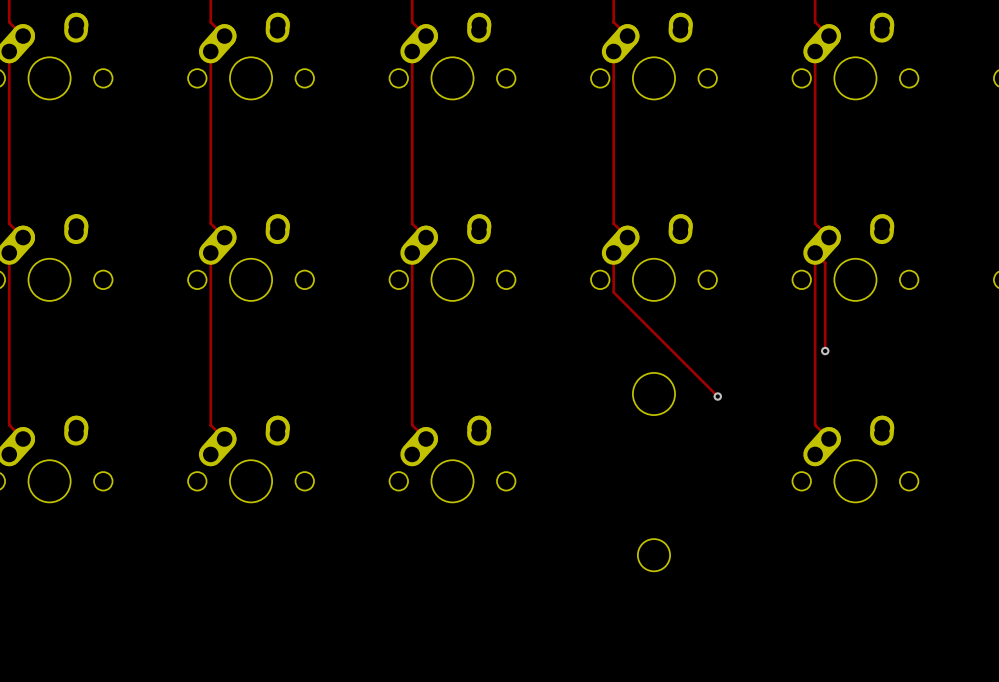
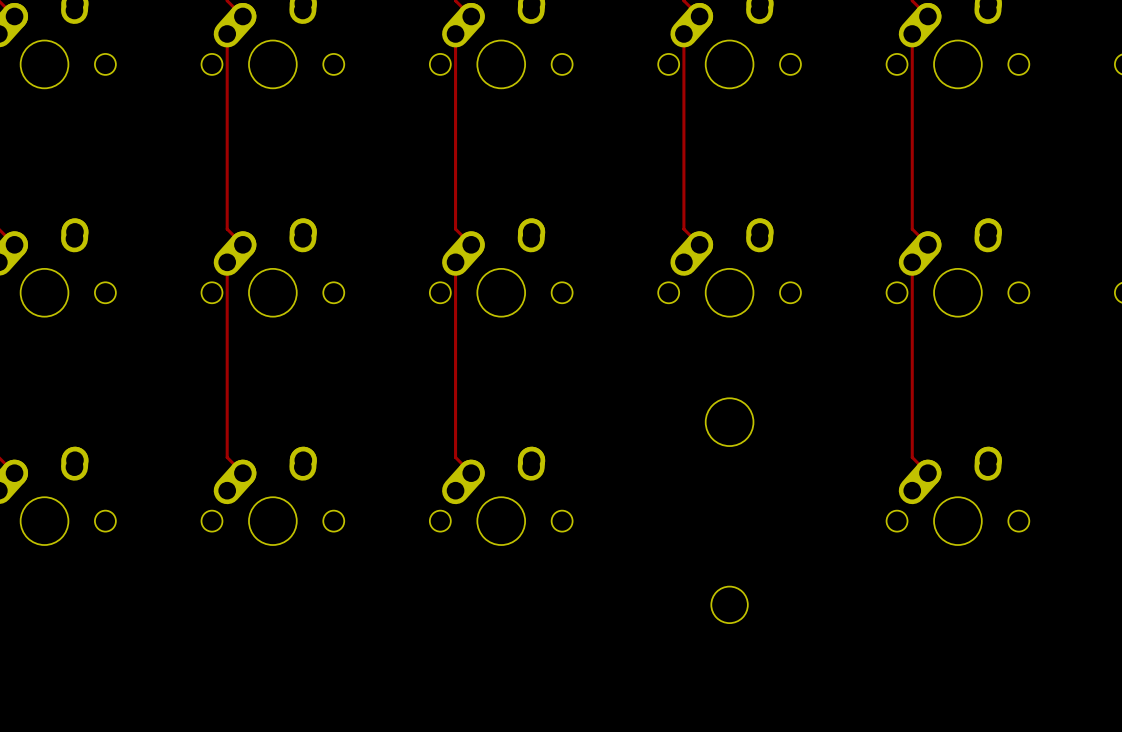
track: (613, 252) (613, 292) (717, 396) -> none
track: (815, 252) (825, 263) (825, 351) -> none
via: (825, 351) -> none
via: (717, 396) -> none

